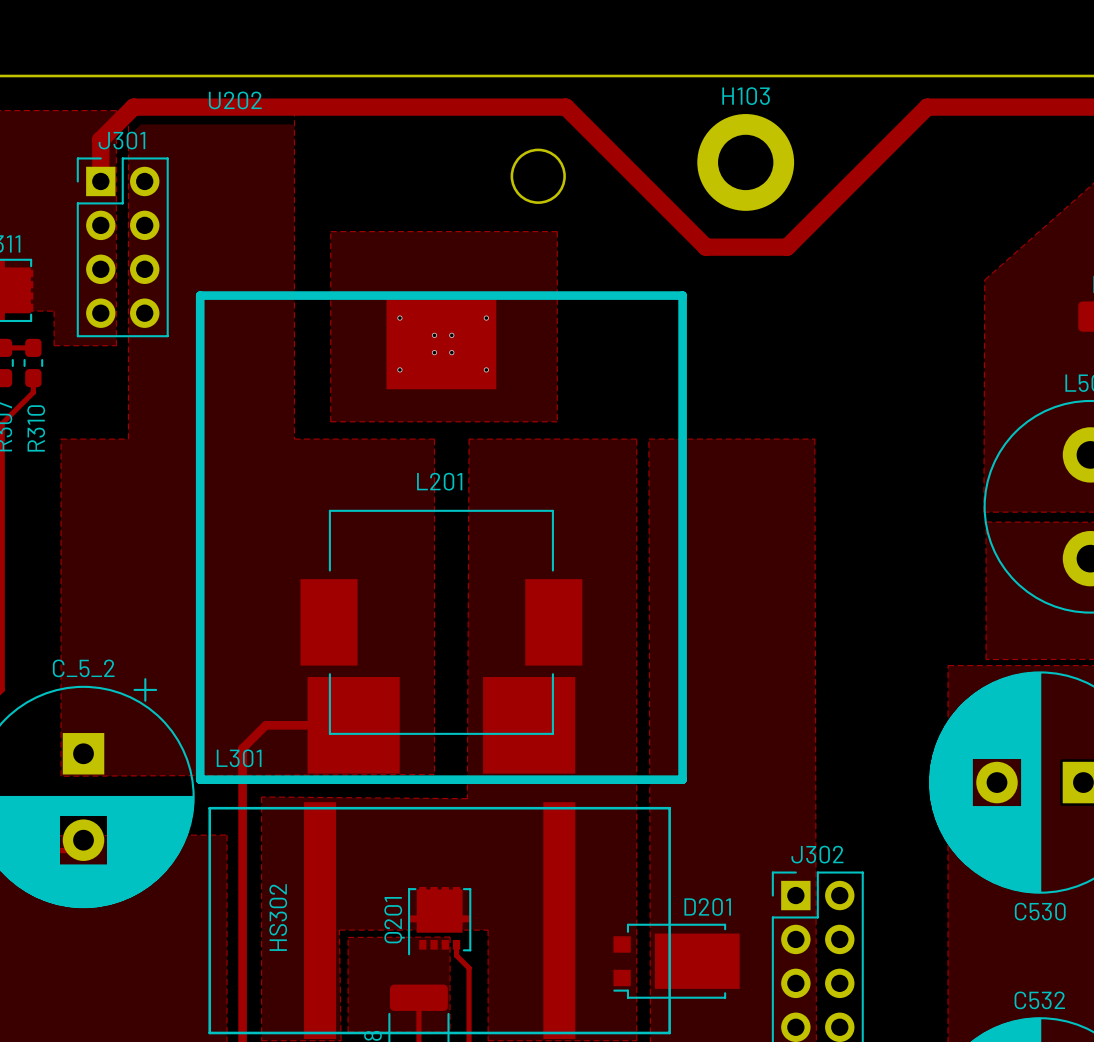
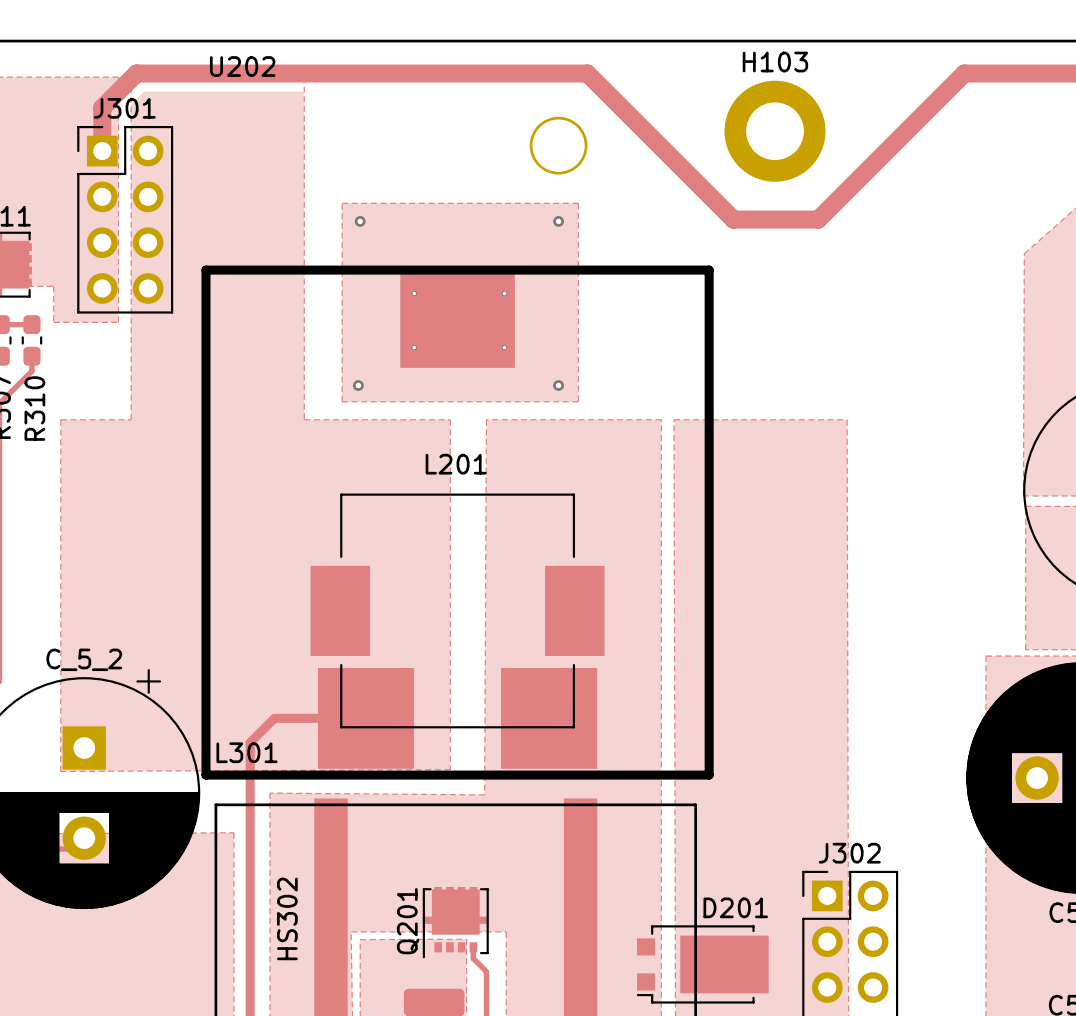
via: none -> (360, 221)
via: none -> (558, 221)
via: (434, 335) -> none
via: (451, 335) -> none
via: (434, 352) -> none
via: (451, 352) -> none
via: none -> (358, 385)
via: none -> (558, 385)

